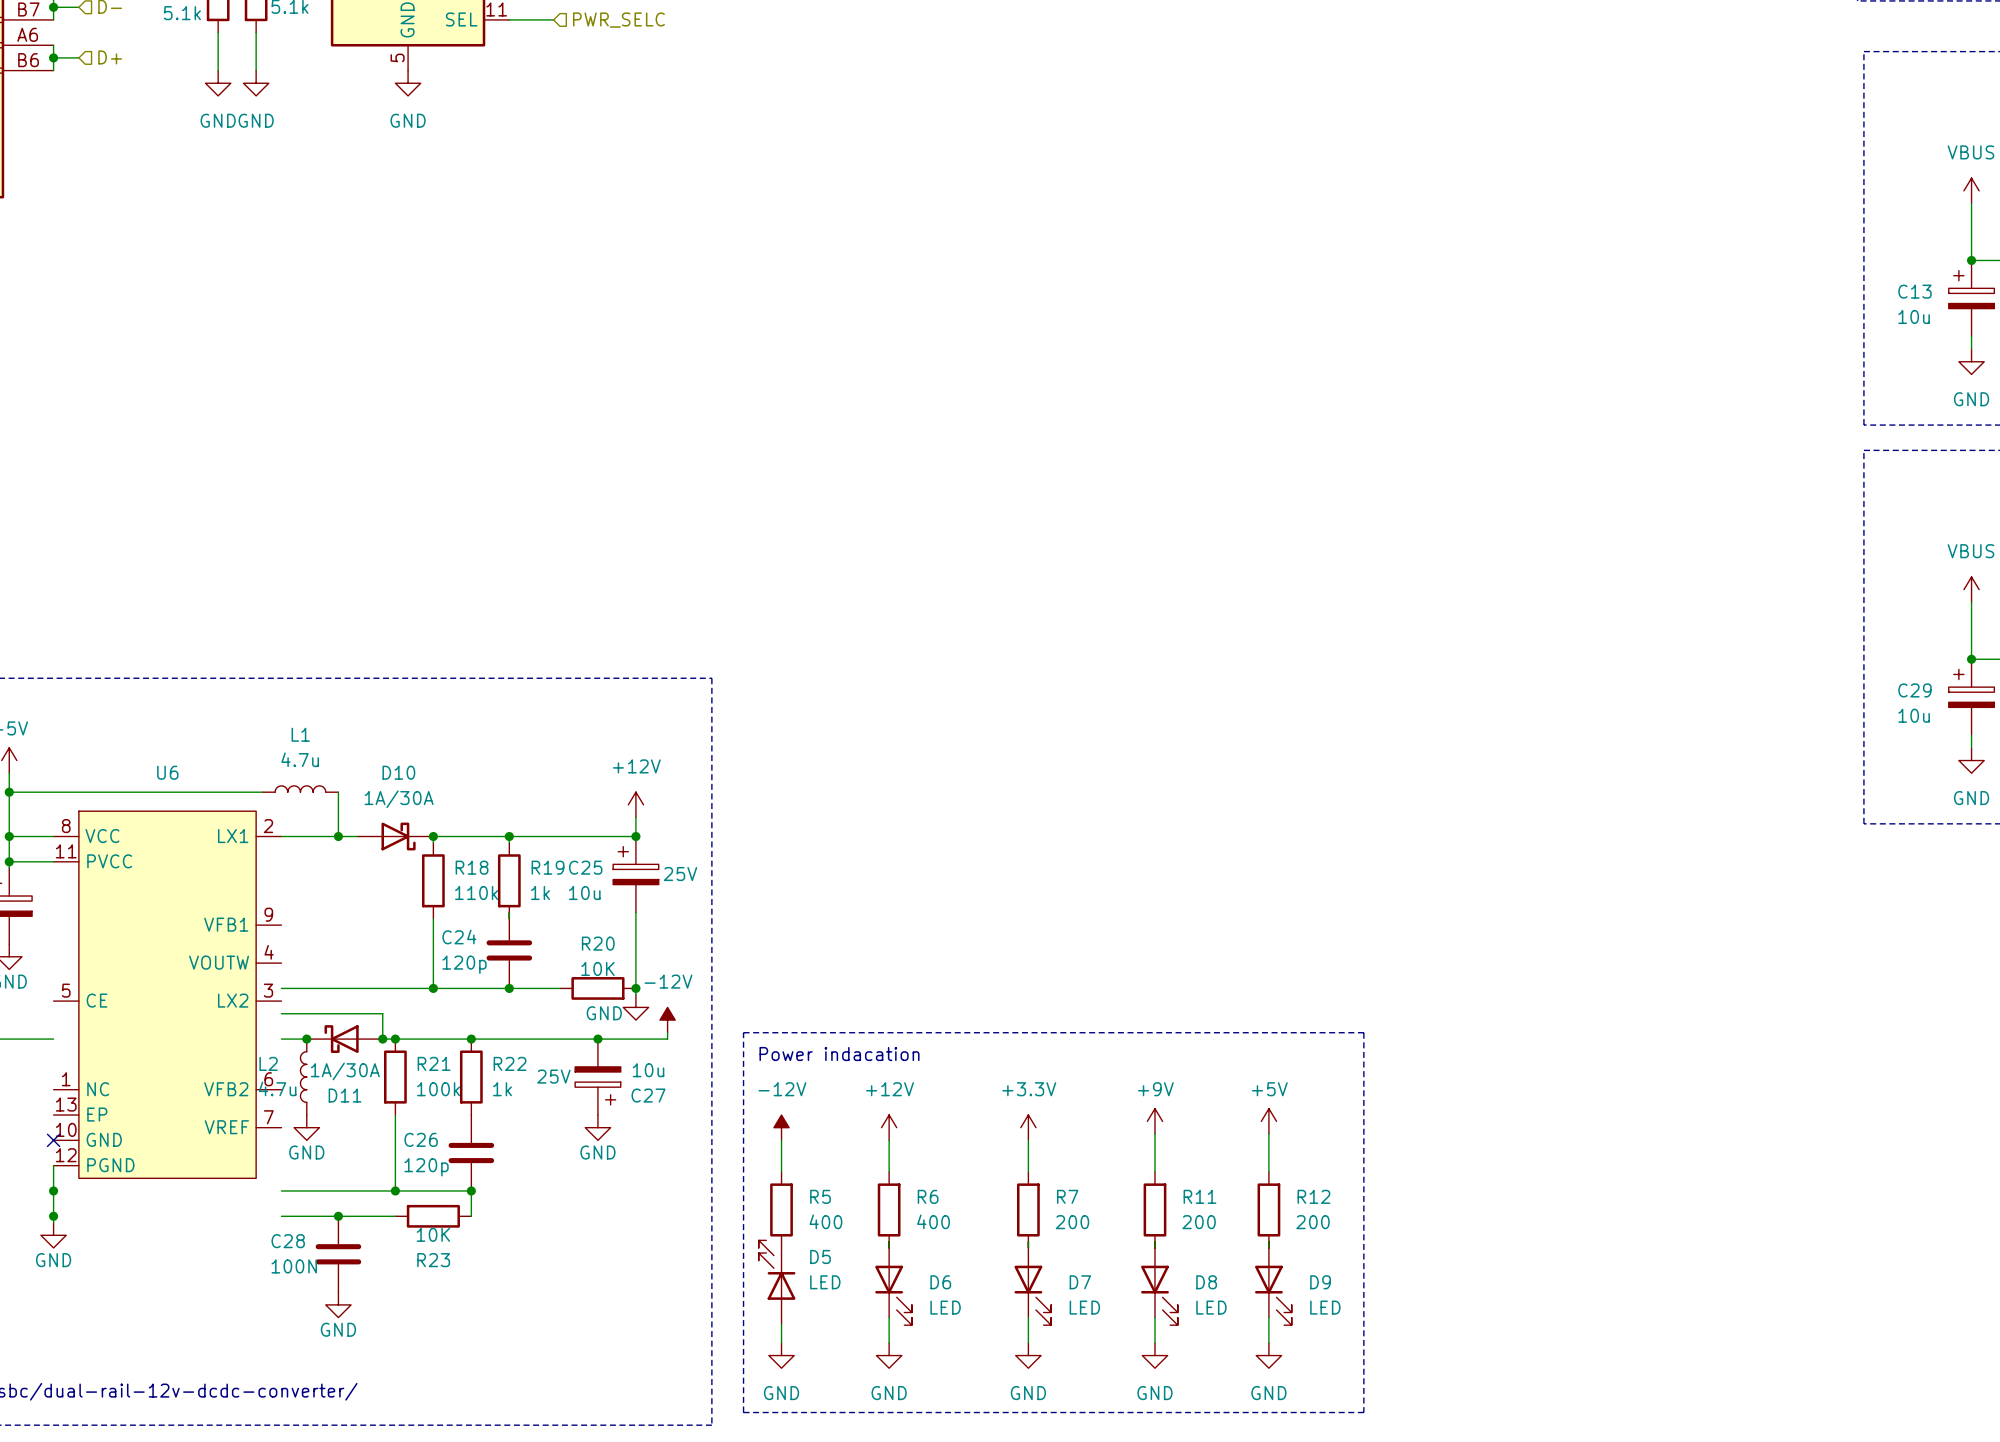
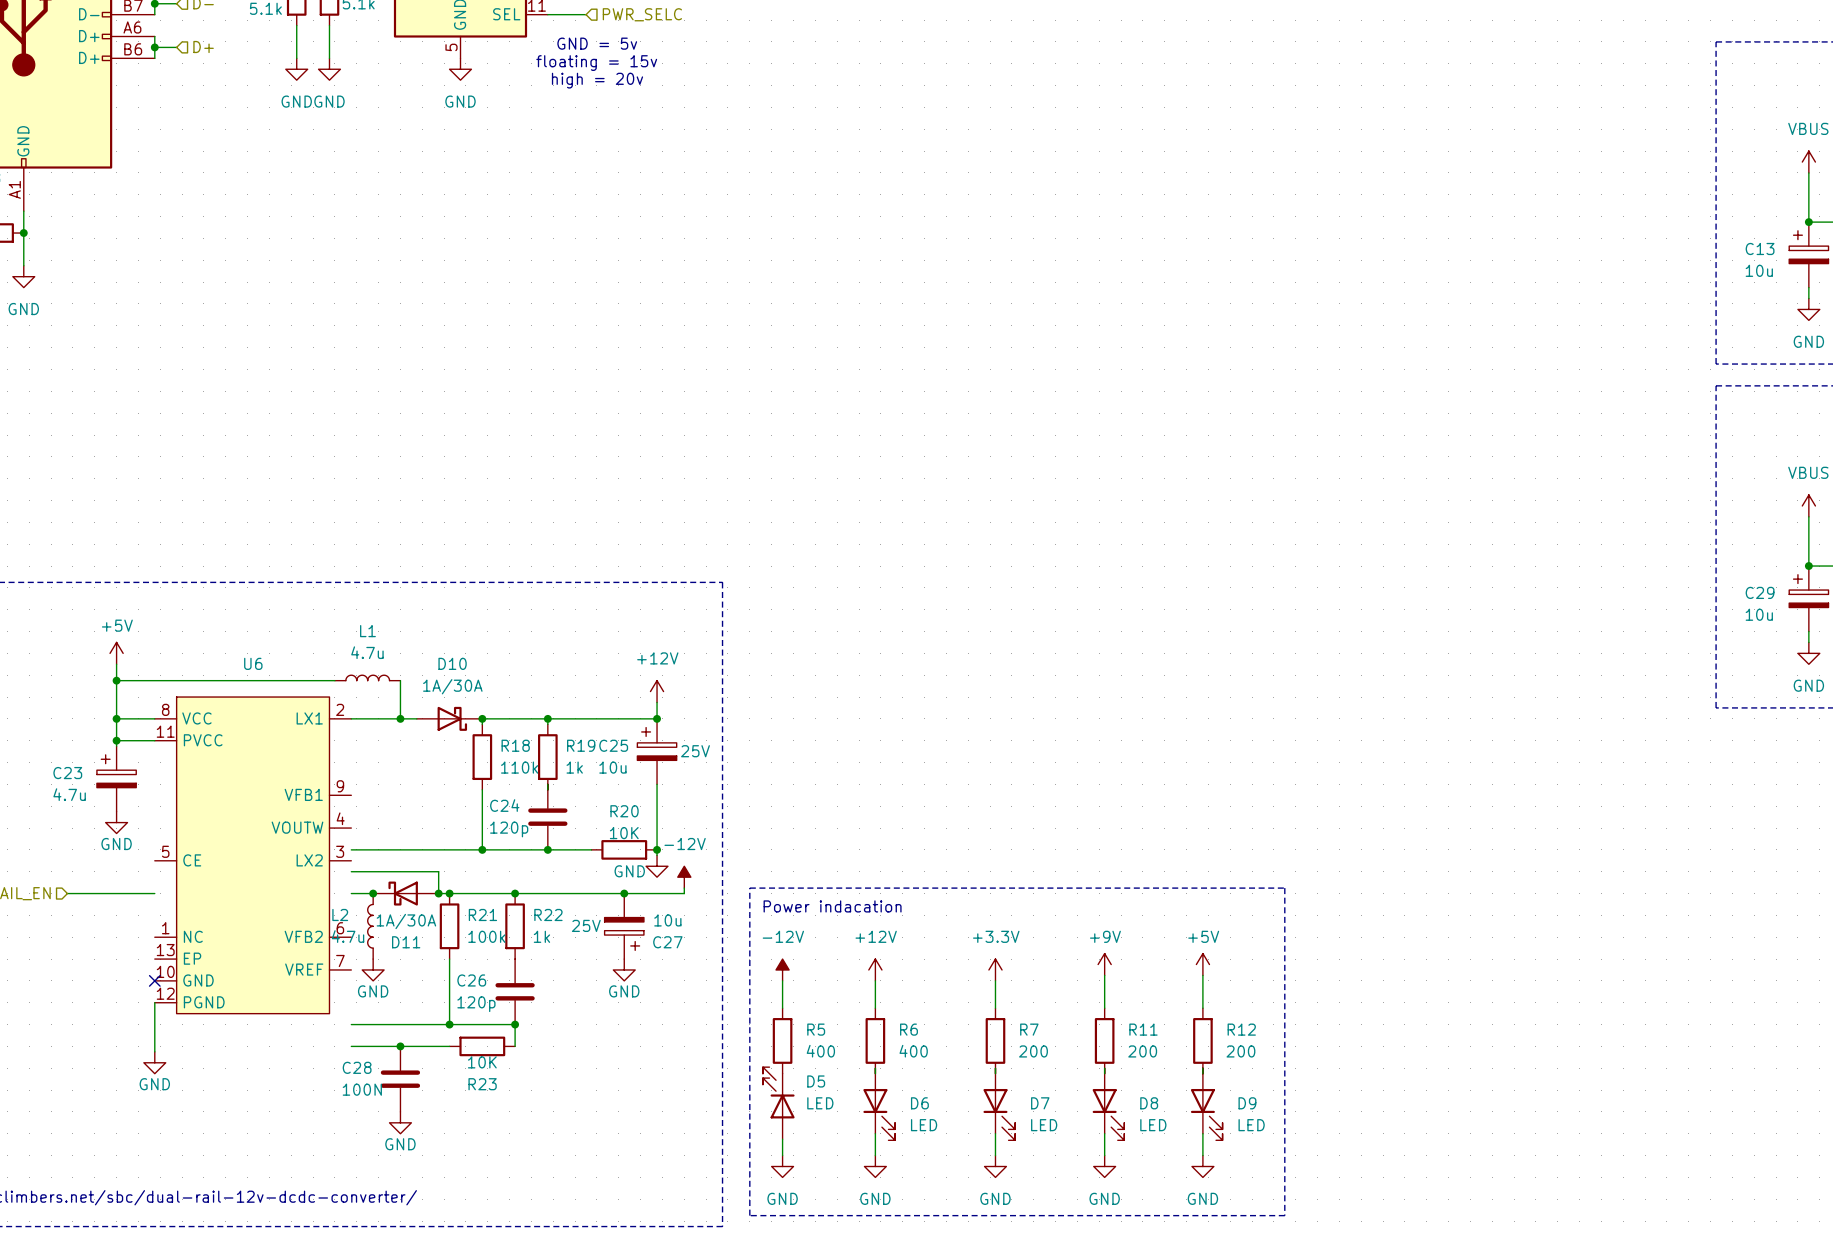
text: none -> GND = 5v (597, 43)
text: none -> floating = 15v (596, 63)
text: none -> high = 20v (597, 80)
junction: (53, 1190) -> none
junction: (53, 1216) -> none

